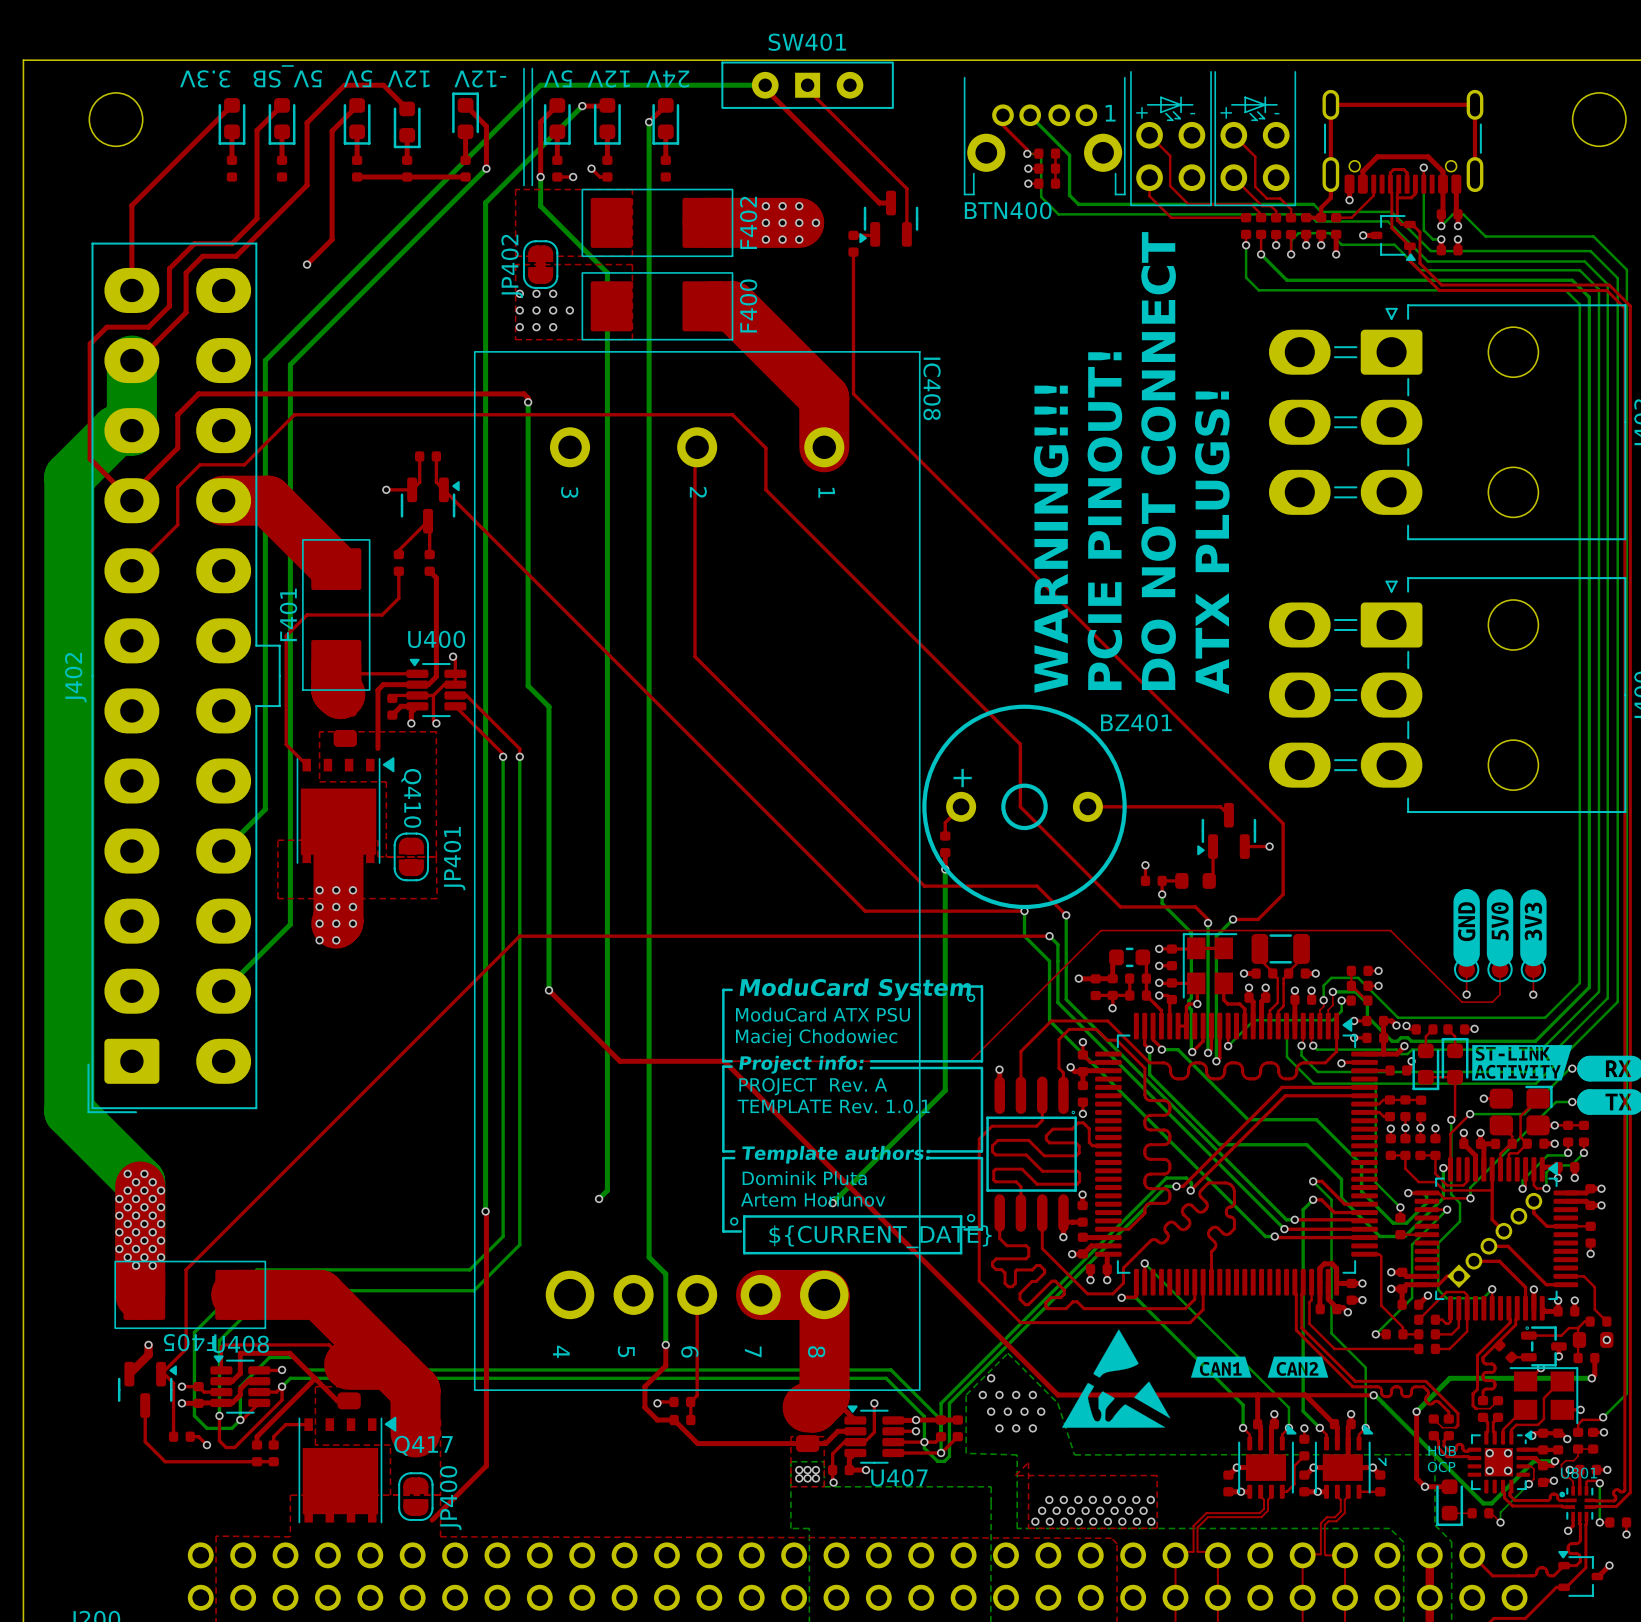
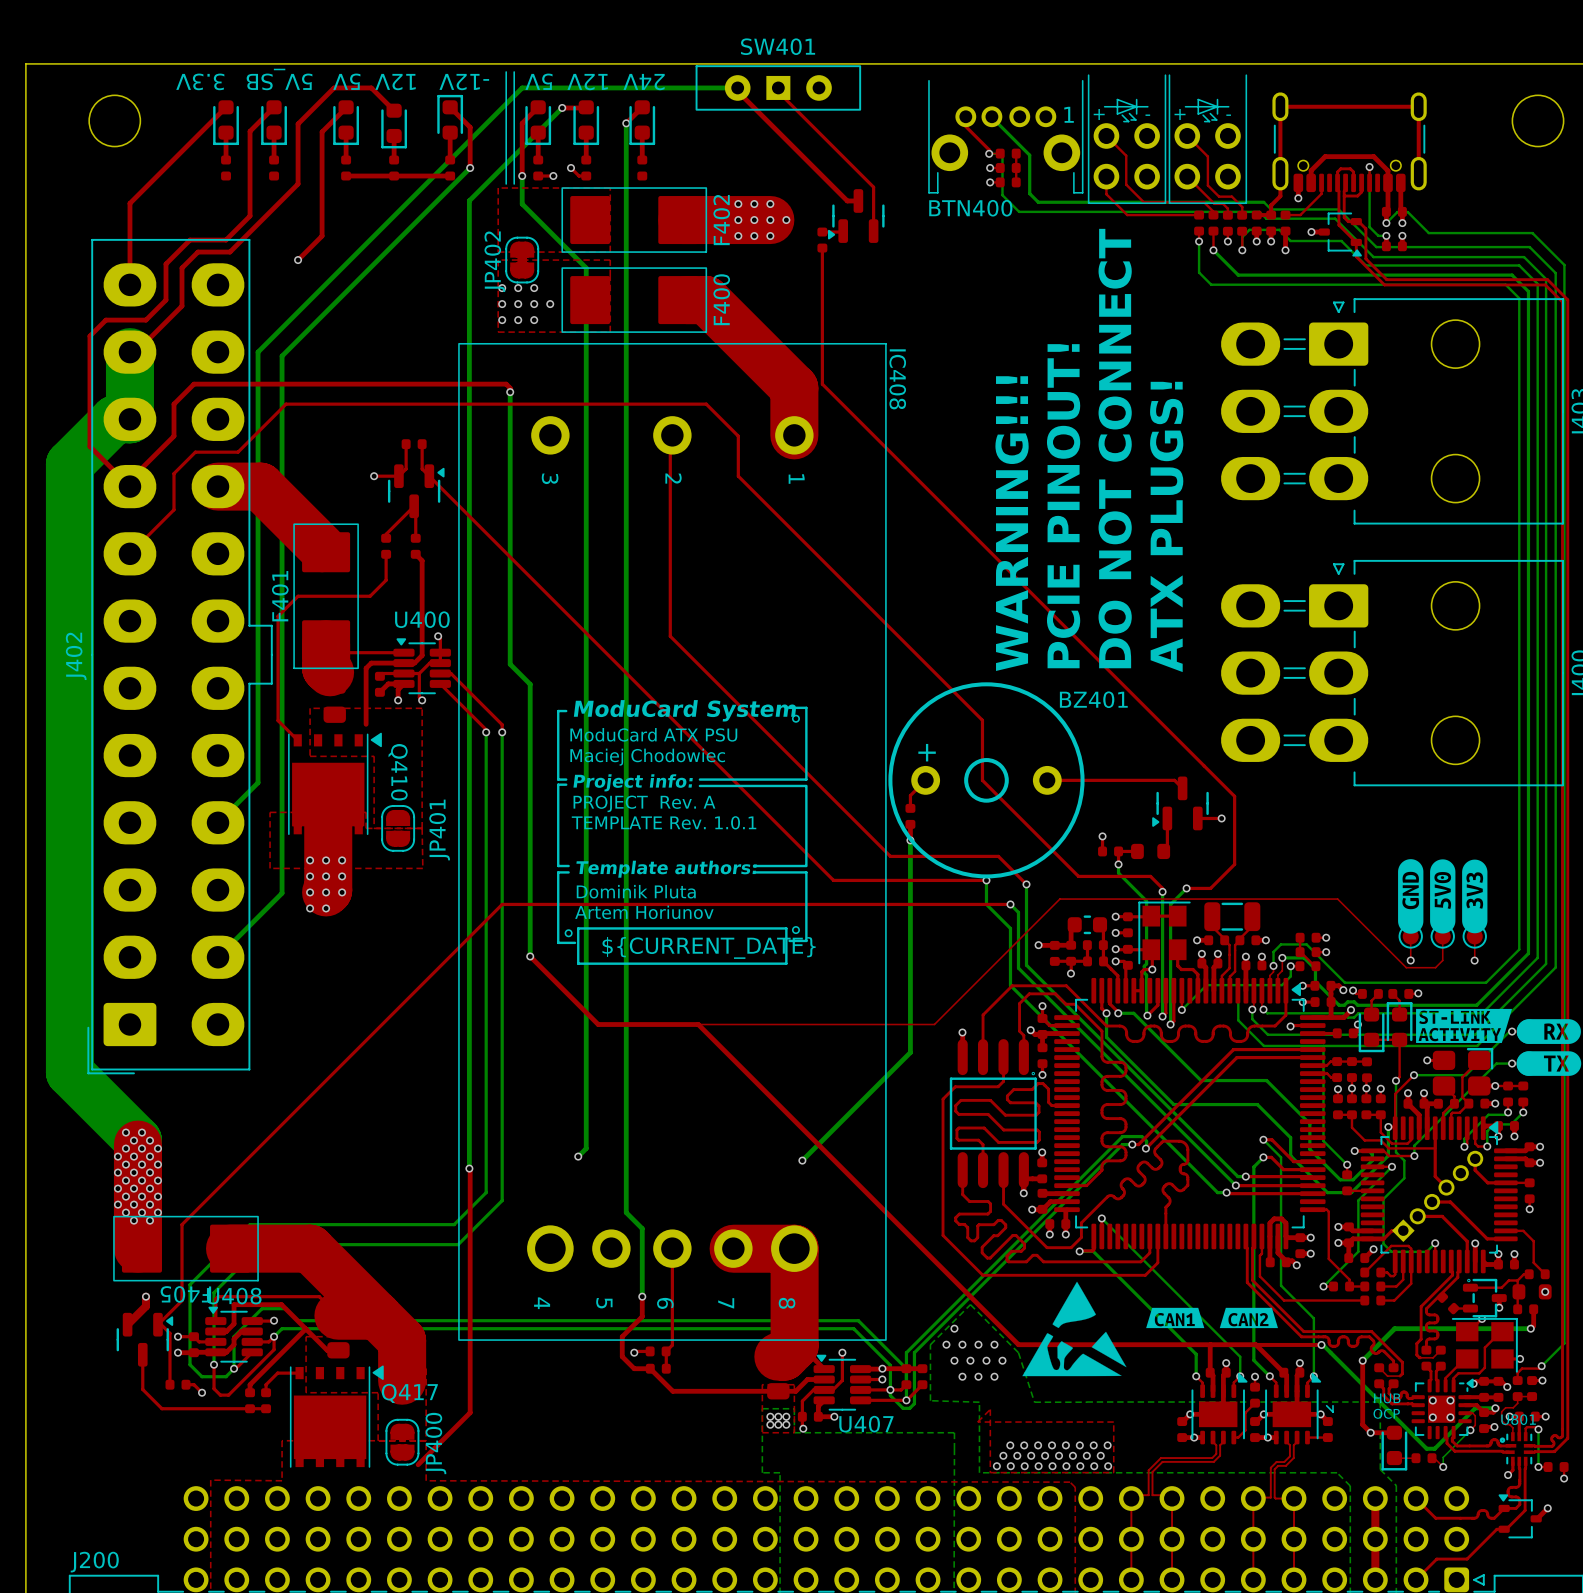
drawing: none -> [791, 714, 800, 723]
drawing: none -> [791, 926, 800, 935]
drawing: none -> [564, 929, 573, 938]
line: (964, 986) (981, 986) (981, 1061) (871, 1061) -> (789, 707) (806, 707) (806, 779) (699, 779)
line: (731, 989) (723, 989) (723, 1061) (731, 1061) -> (566, 711) (558, 711) (558, 779) (566, 779)
text position: ModuCard System (855, 989) -> ModuCard System (685, 710)
drawing: [966, 993, 976, 1003] -> none
text position: ModuCard ATX PSU (822, 1014) -> ModuCard ATX PSU (653, 734)
text position: Maciej Chodowiec (816, 1037) -> Maciej Chodowiec (647, 757)
text position: Project info: (801, 1064) -> Project info: (633, 782)
line: (731, 1066) (723, 1066) (723, 1151) (734, 1151) -> (566, 784) (558, 784) (558, 866) (568, 866)
line: (871, 1067) (981, 1067) -> (699, 785) (805, 785)
line: (981, 1067) (981, 1151) -> (806, 785) (806, 866)
text position: PROJECT Rev. A (813, 1086) -> PROJECT Rev. A (644, 803)
text position: TEMPLATE Rev. 1.0.1 (833, 1106) -> TEMPLATE Rev. 1.0.1 (664, 822)
line: (927, 1151) (981, 1151) -> (753, 866) (805, 866)
text position: Template authors: (836, 1154) -> Template authors: (666, 869)
line: (734, 1158) (723, 1158) (723, 1231) (740, 1231) -> (568, 872) (558, 872) (558, 942) (575, 942)
line: (927, 1158) (981, 1158) (981, 1229) (964, 1229) -> (754, 872) (806, 872) (806, 940) (789, 940)
text position: Dominik Pluta (804, 1178) -> Dominik Pluta (636, 891)
text position: Artem Horiunov (813, 1199) -> Artem Horiunov (644, 912)
drawing: [966, 1213, 976, 1223] -> none
line: (744, 1216) (961, 1216) (961, 1253) (744, 1253) (744, 1216) -> (578, 928) (786, 928) (786, 963) (578, 963) (578, 928)
drawing: [730, 1217, 739, 1226] -> none
text position: ${CURRENT_DATE} (880, 1236) -> ${CURRENT_DATE} (709, 947)

